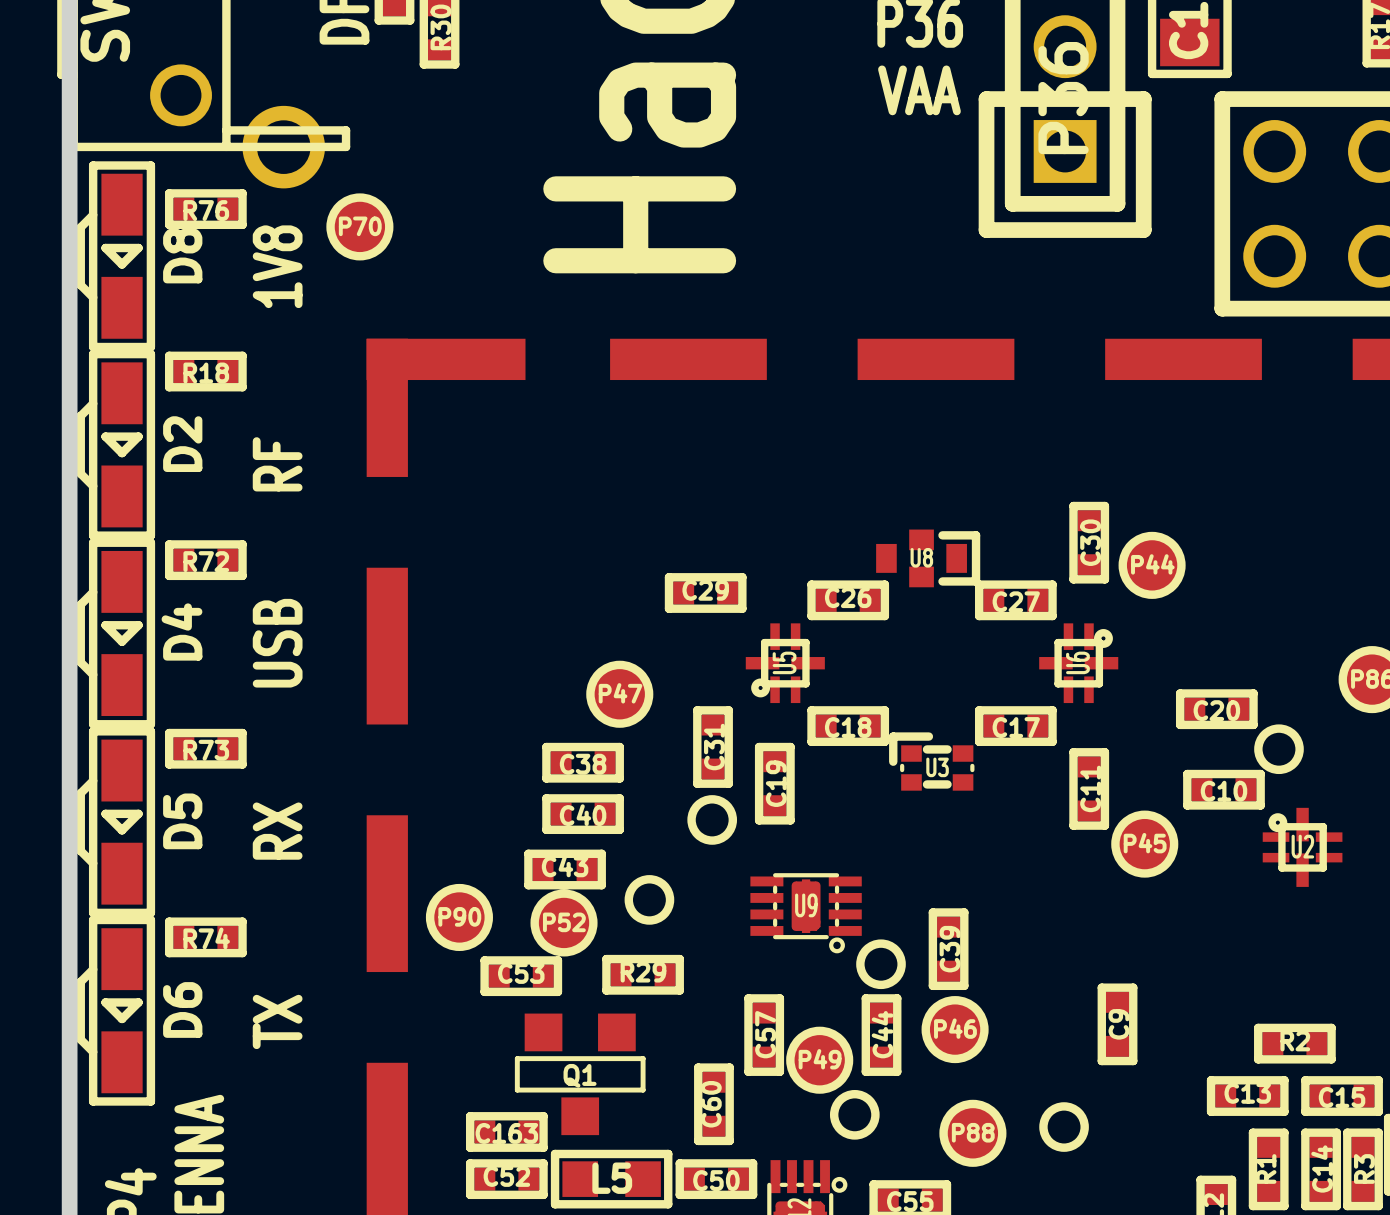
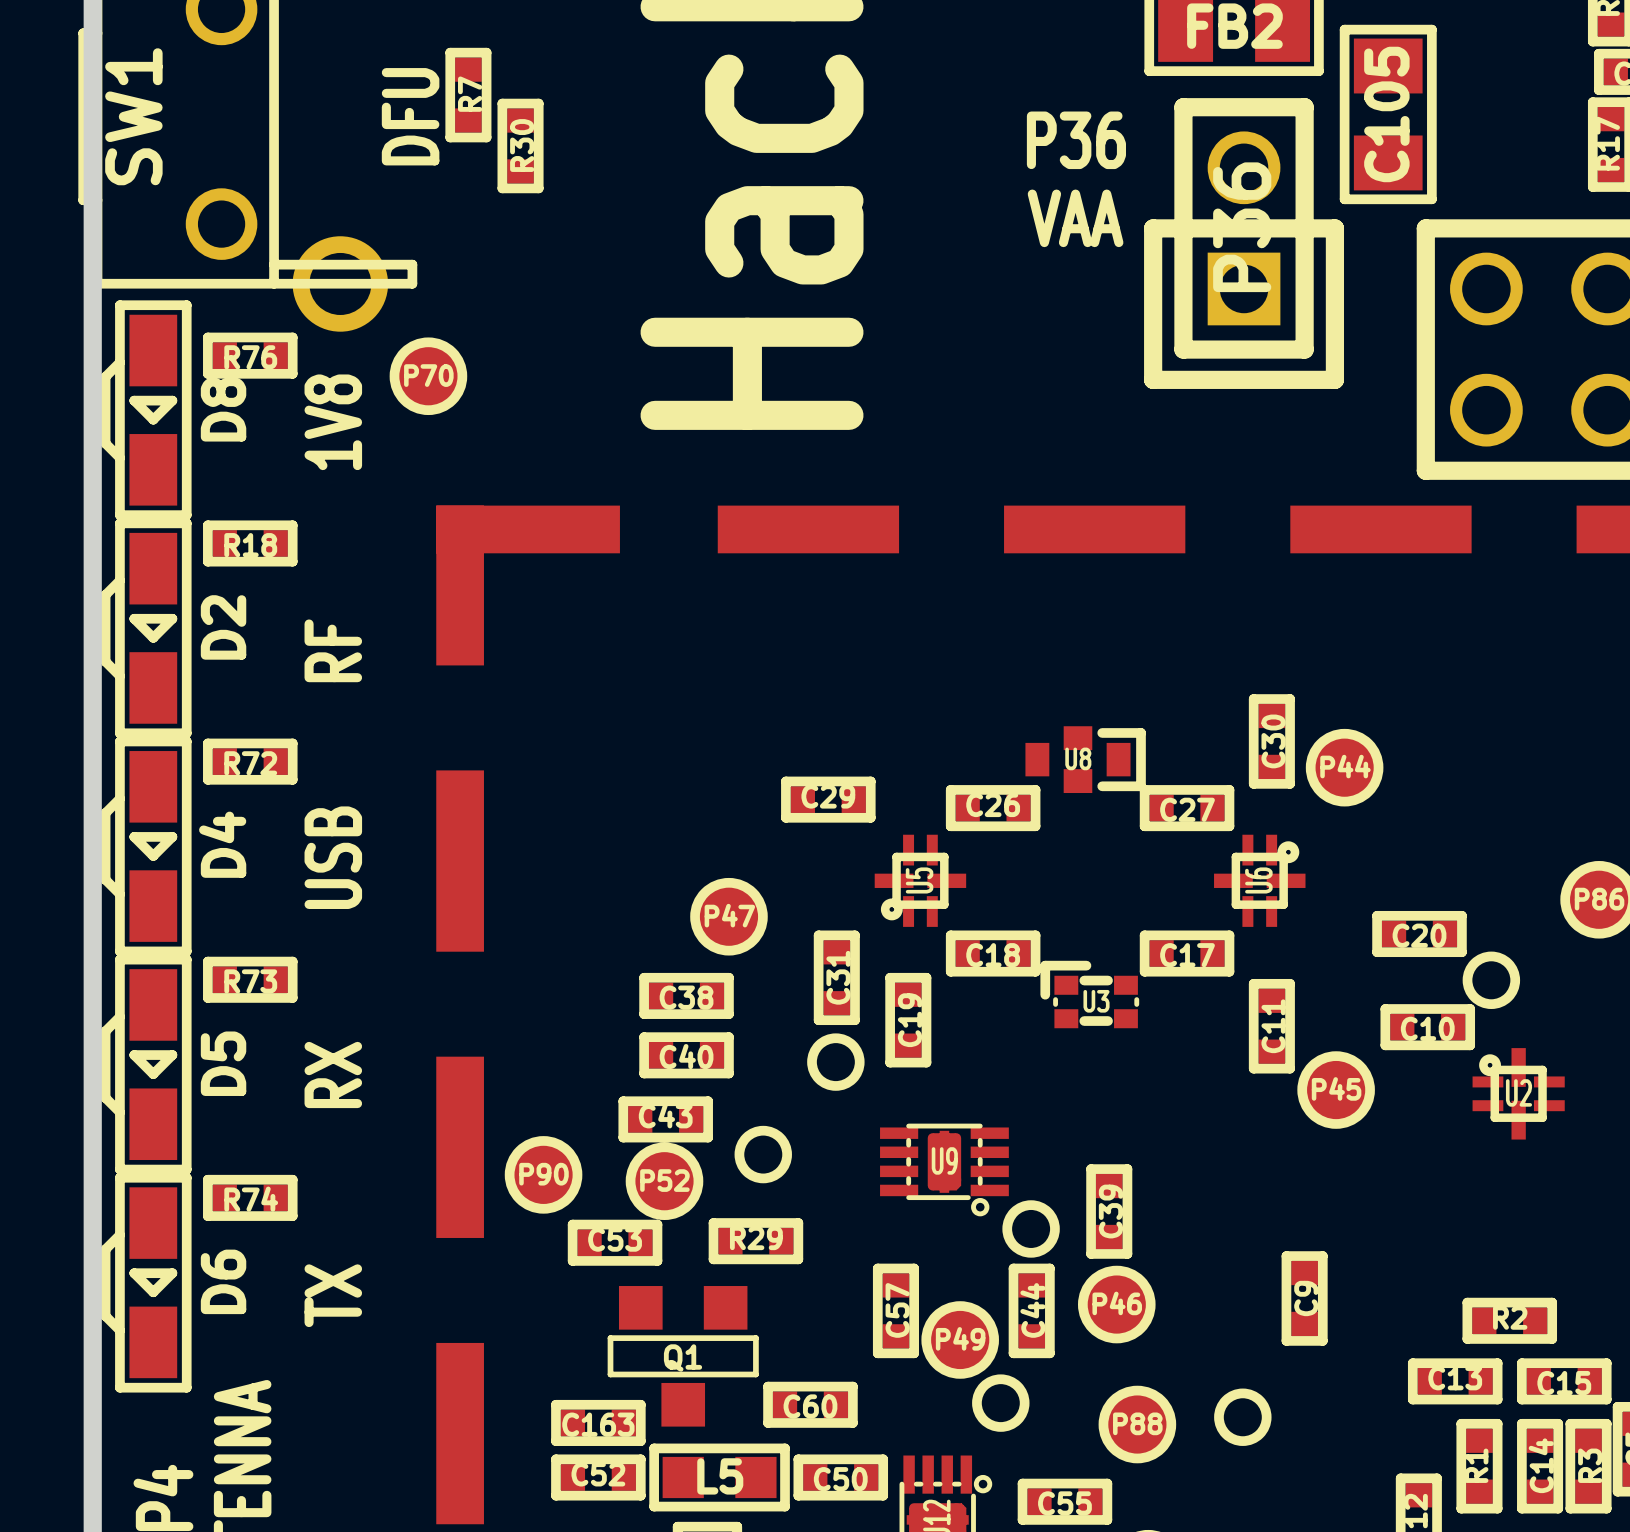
C60 rotation: 0° (713, 1104) -> 90° clockwise (810, 1404)

